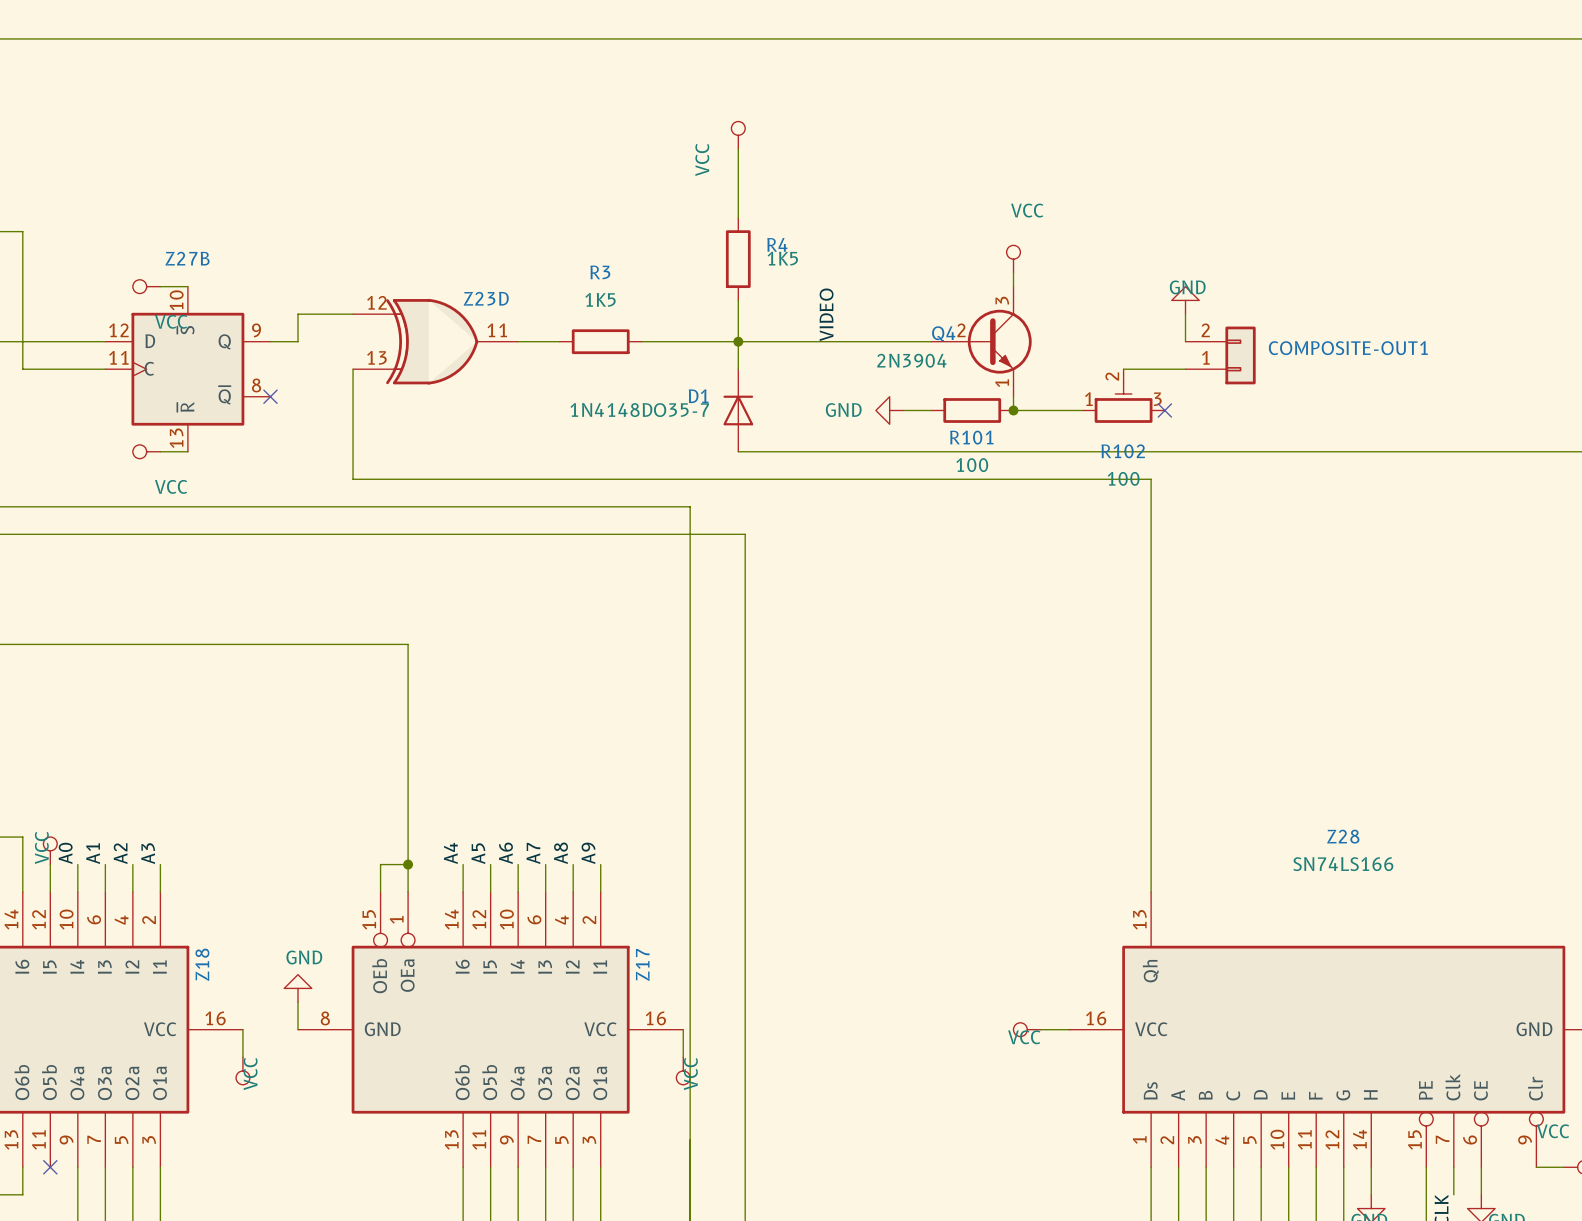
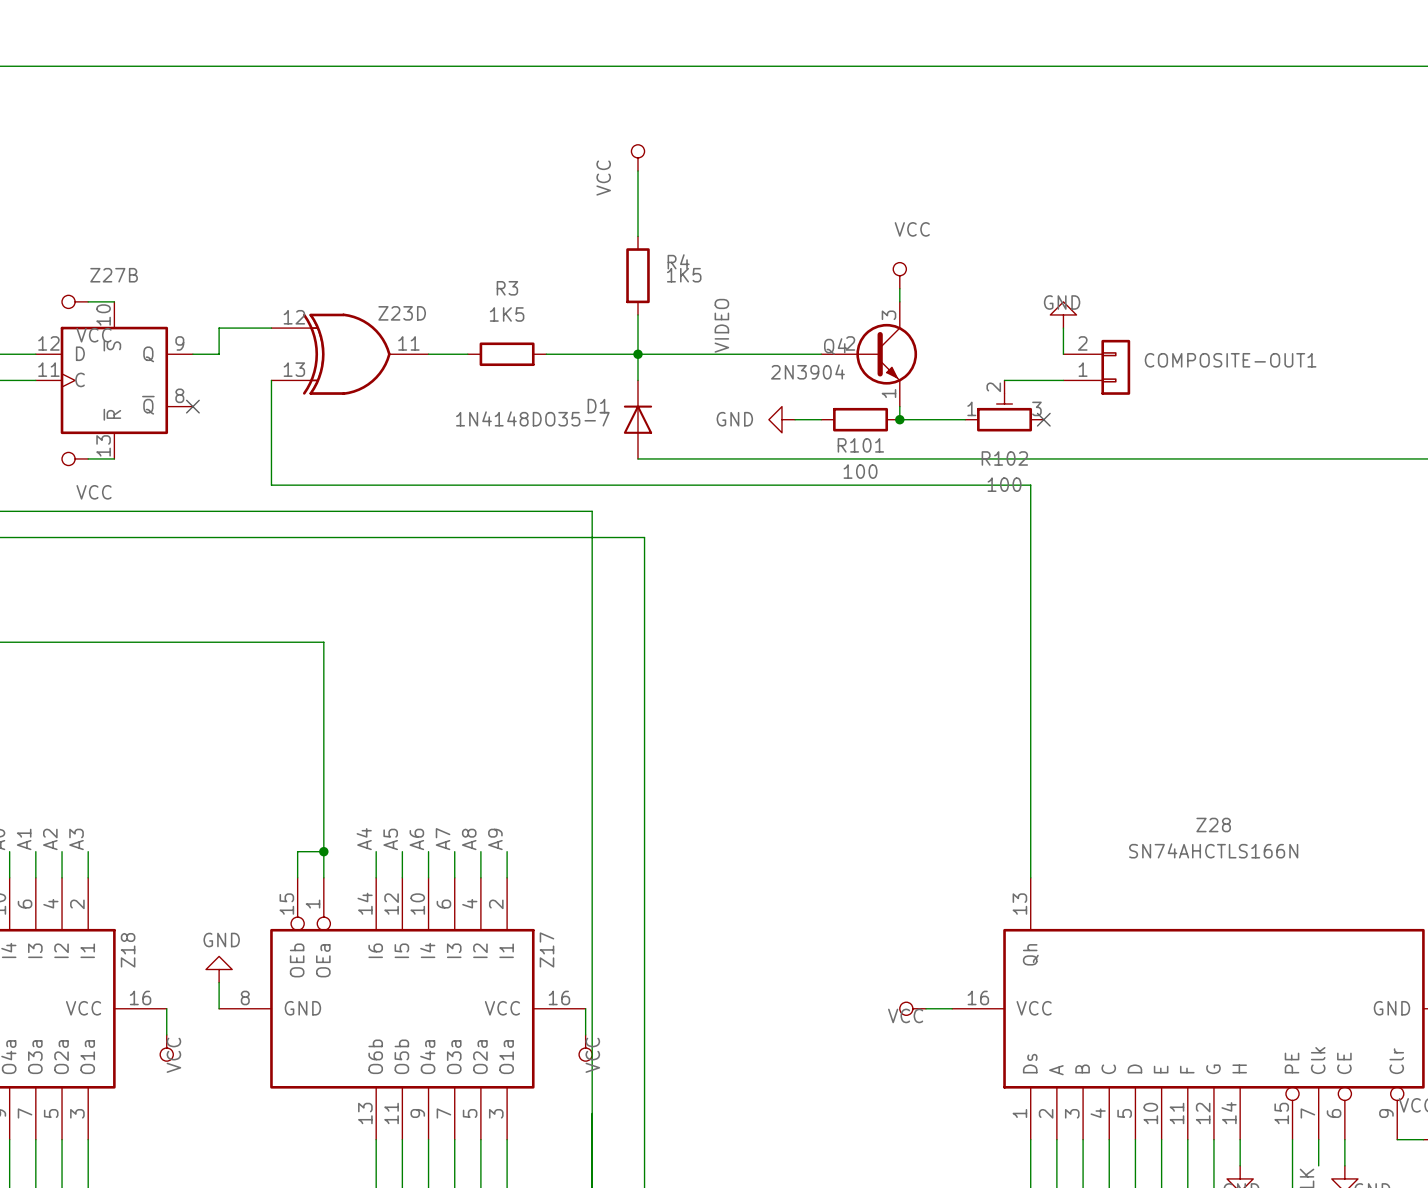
Z28 value: SN74LS166 (1343, 864) -> SN74AHCTLS166N (1213, 850)

